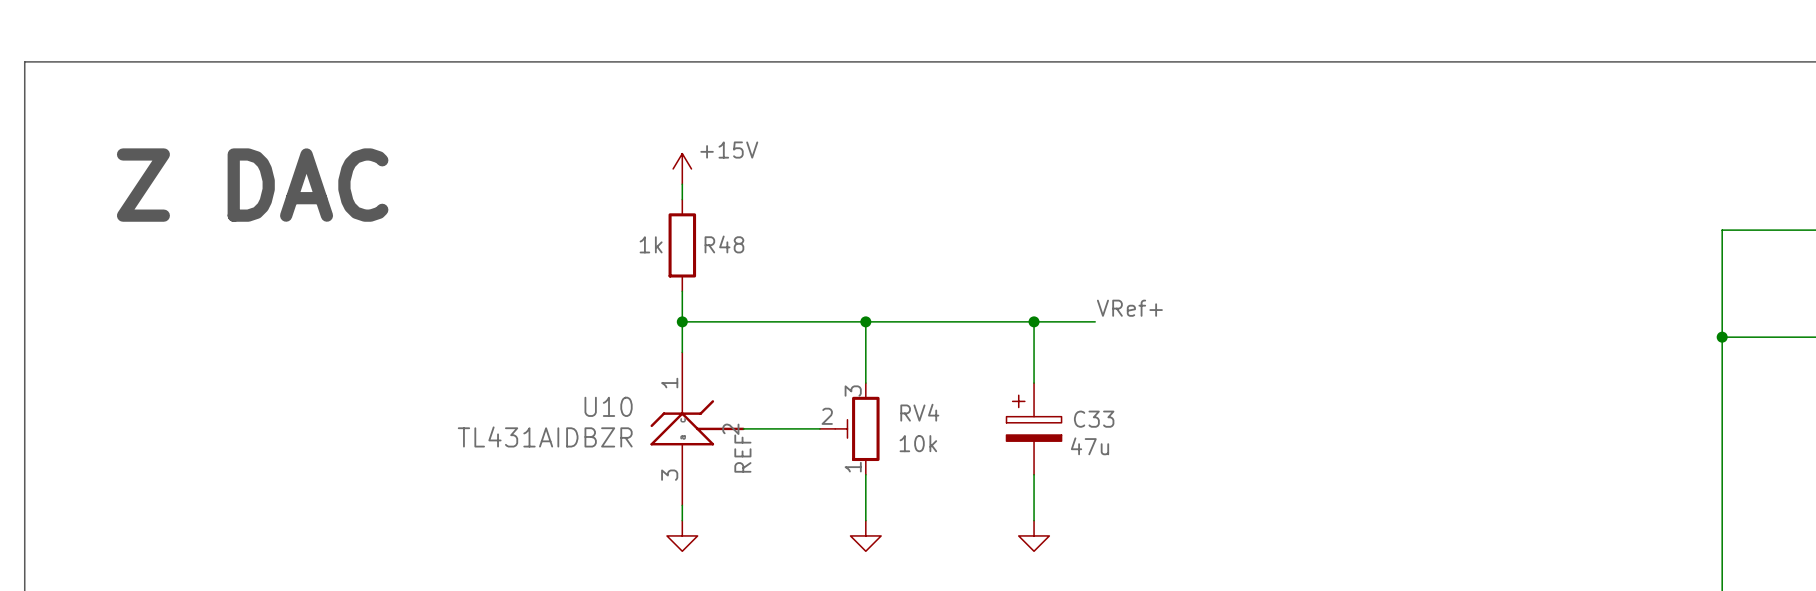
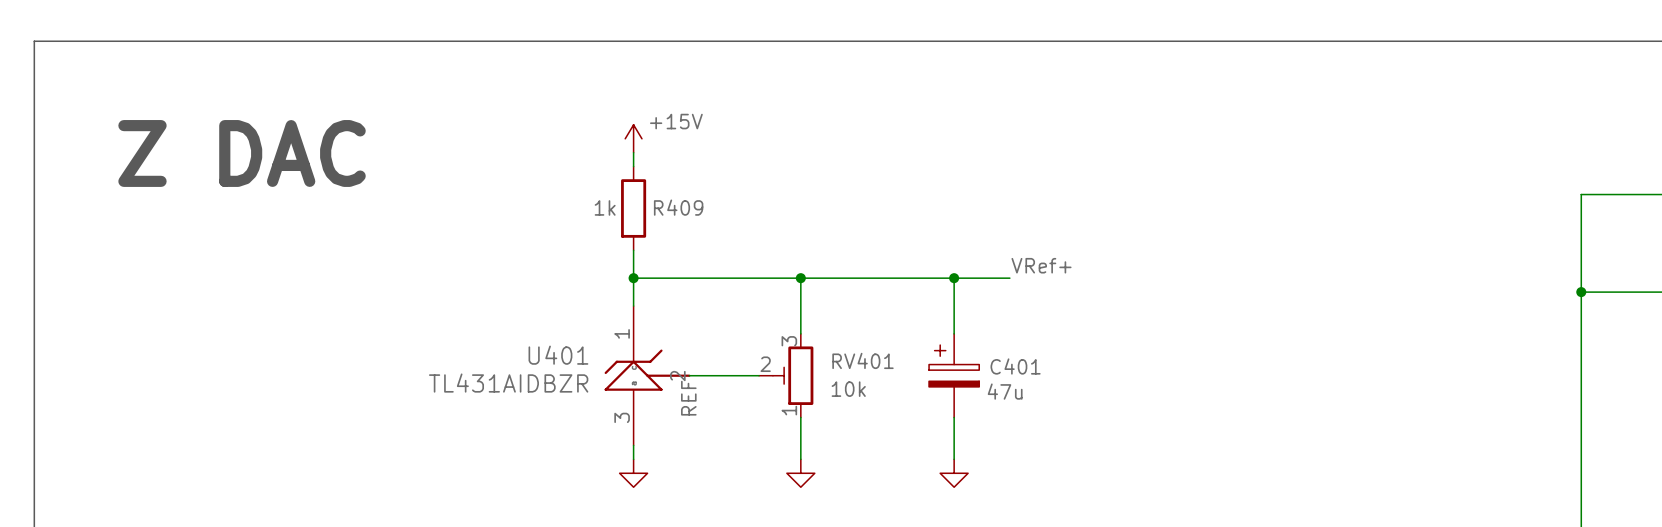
R48 name: R48 (724, 244) -> R409 (678, 207)
U10 name: U10 (608, 406) -> U401 (558, 355)
RV4 name: RV4 (919, 412) -> RV401 (862, 360)
C33 name: C33 (1094, 419) -> C401 (1015, 366)

